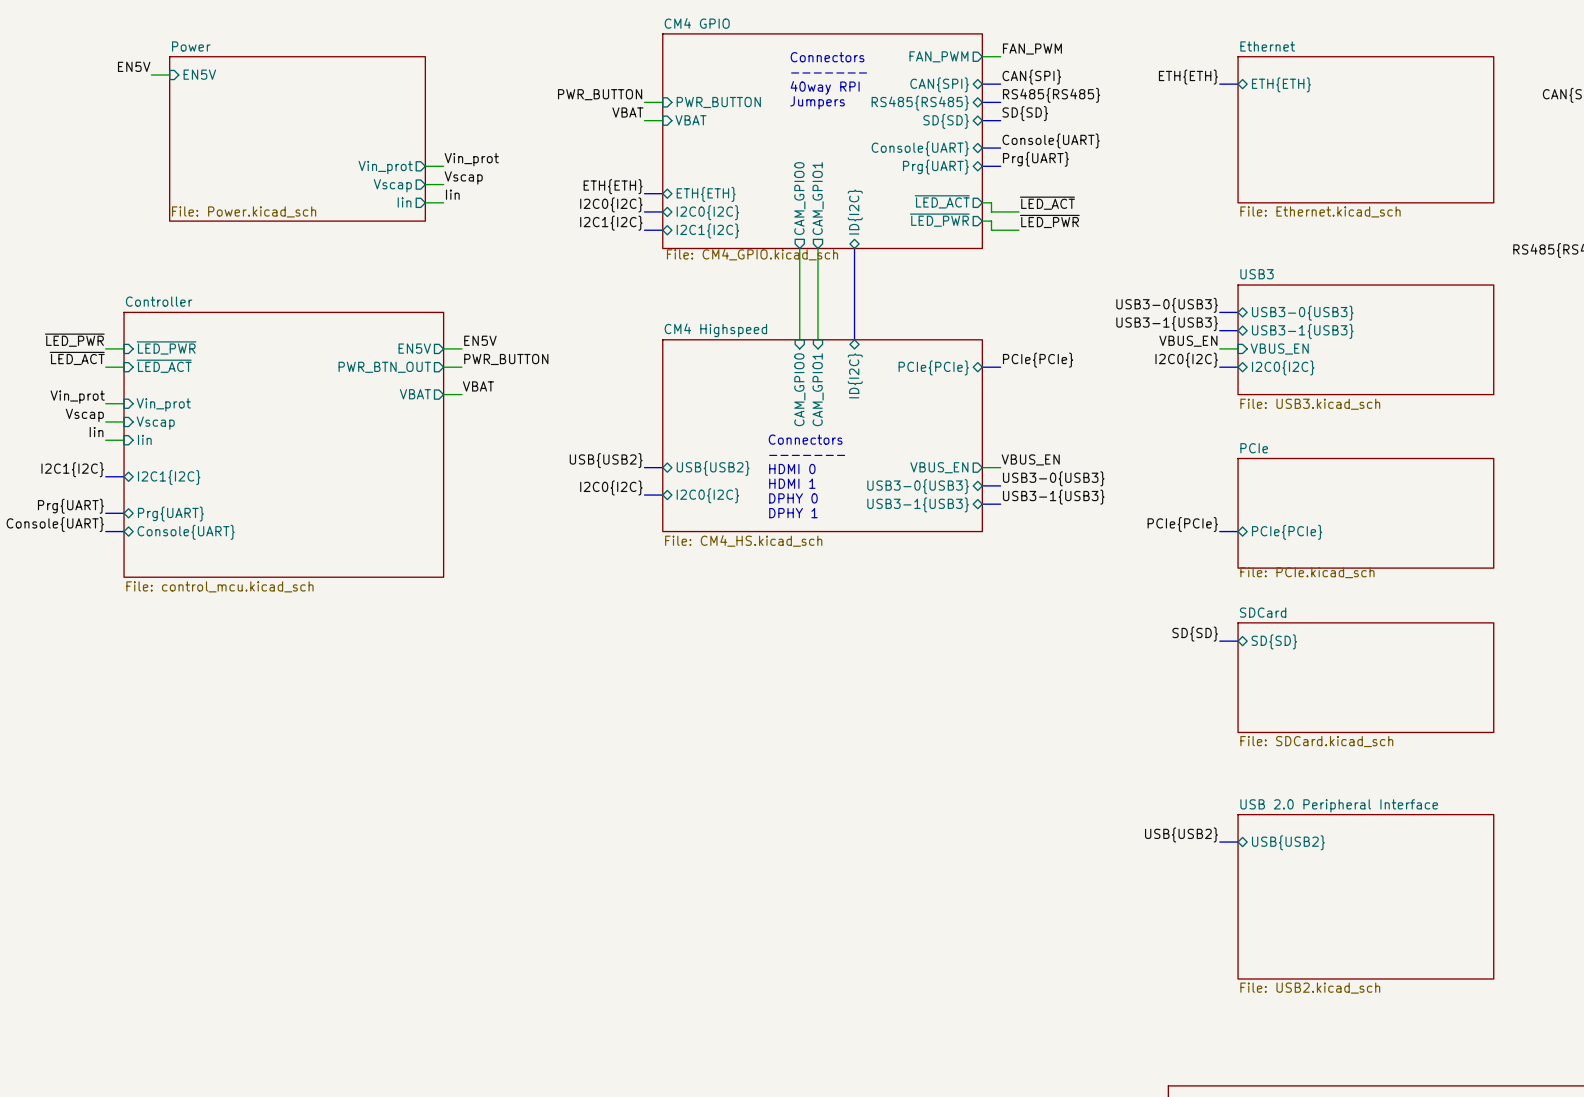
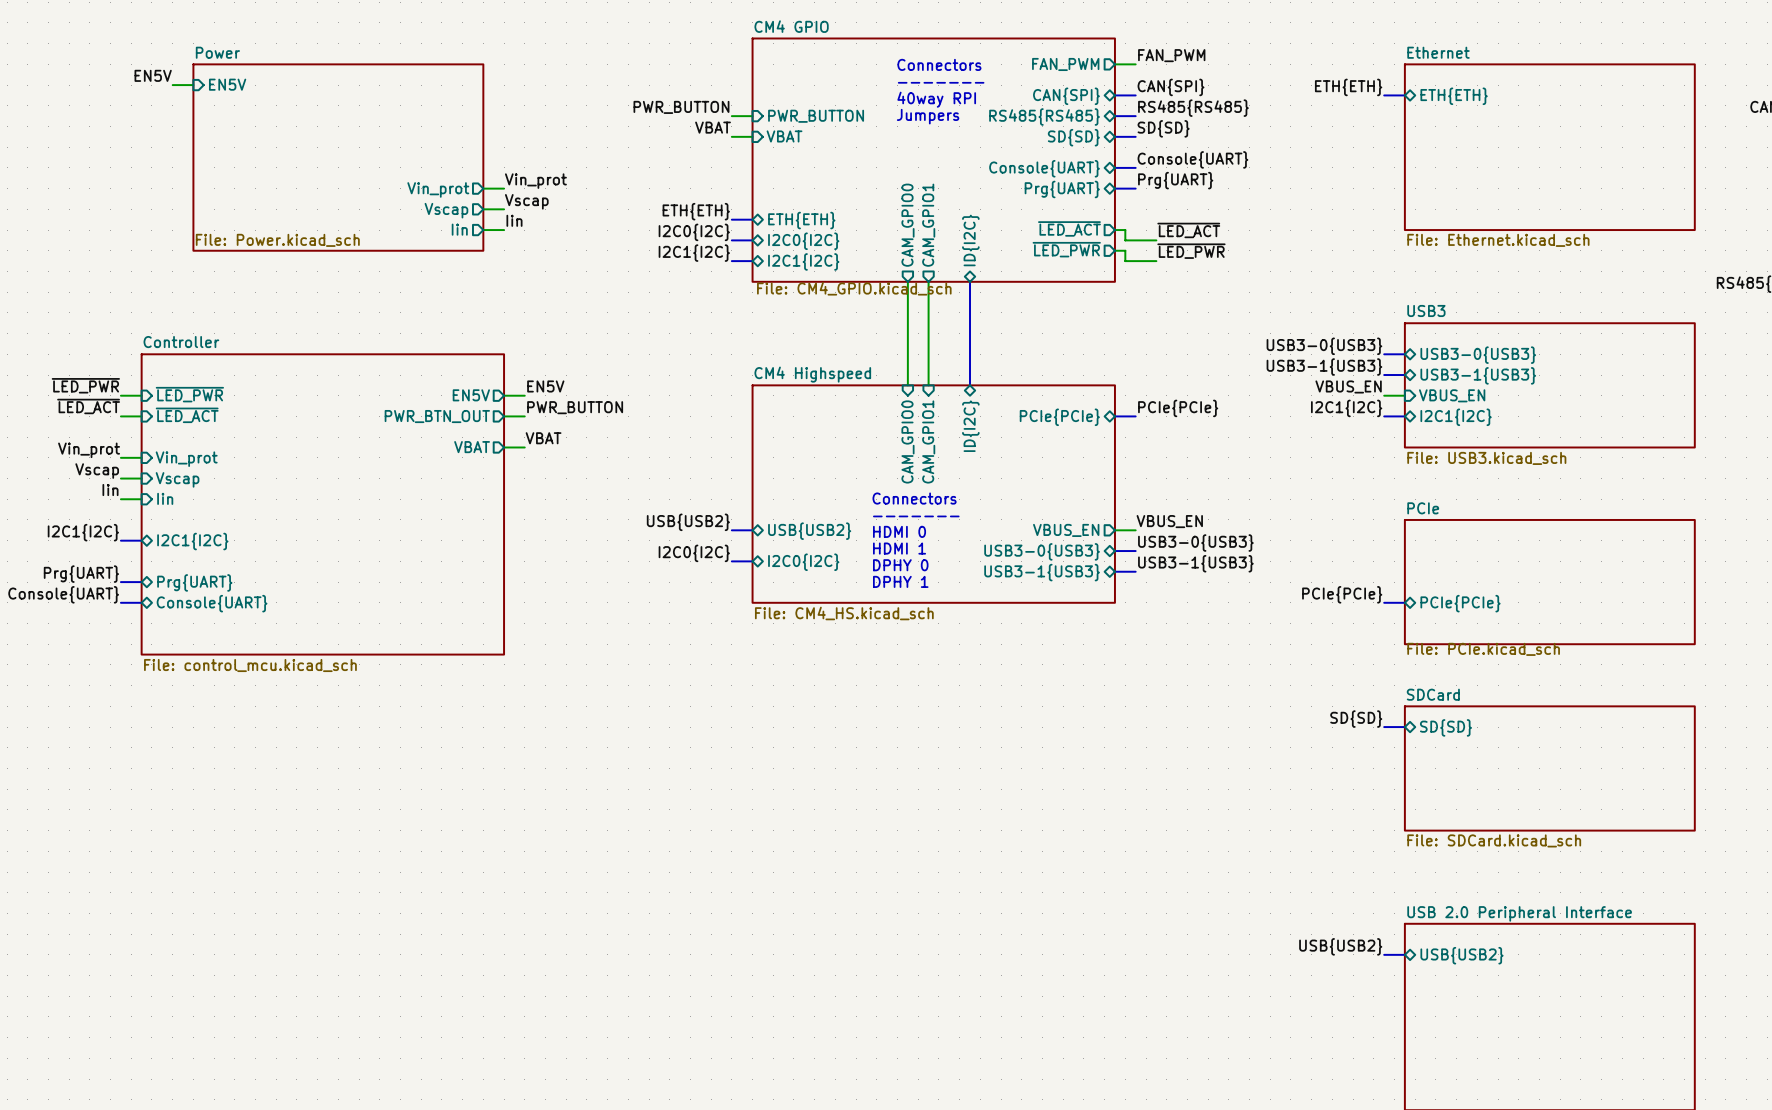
label: I2C0{I2C} (1186, 360) -> I2C1{I2C} (1346, 408)
sheet pin: I2C0{I2C} (1283, 367) -> I2C1{I2C} (1456, 417)

